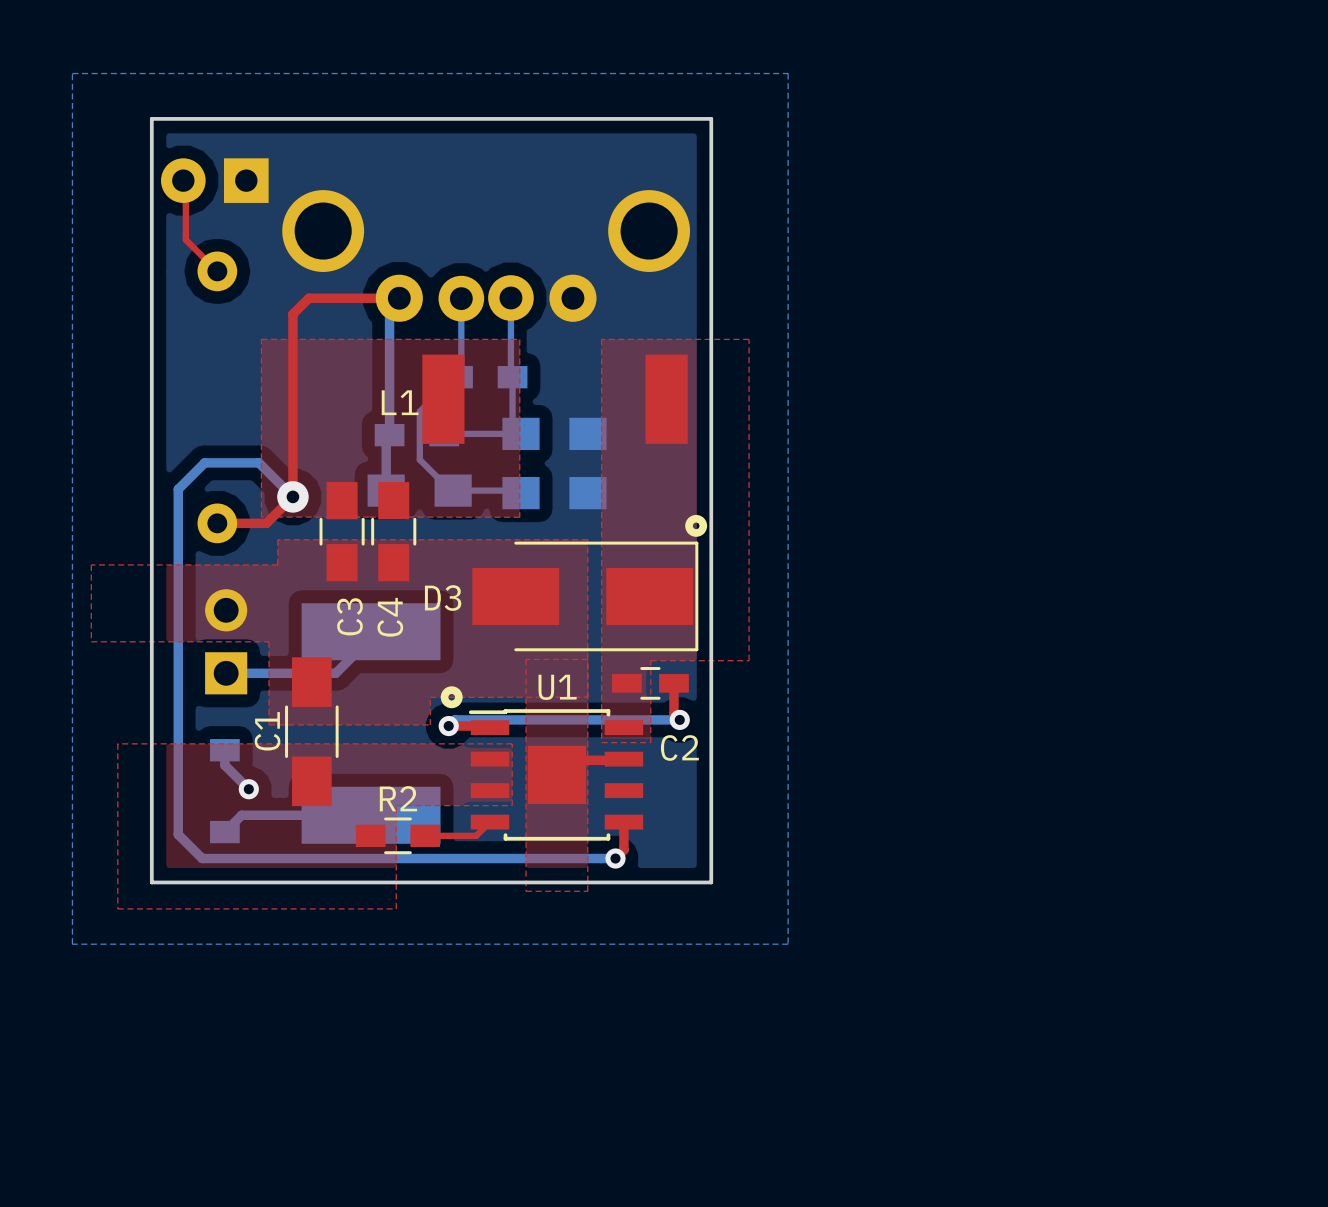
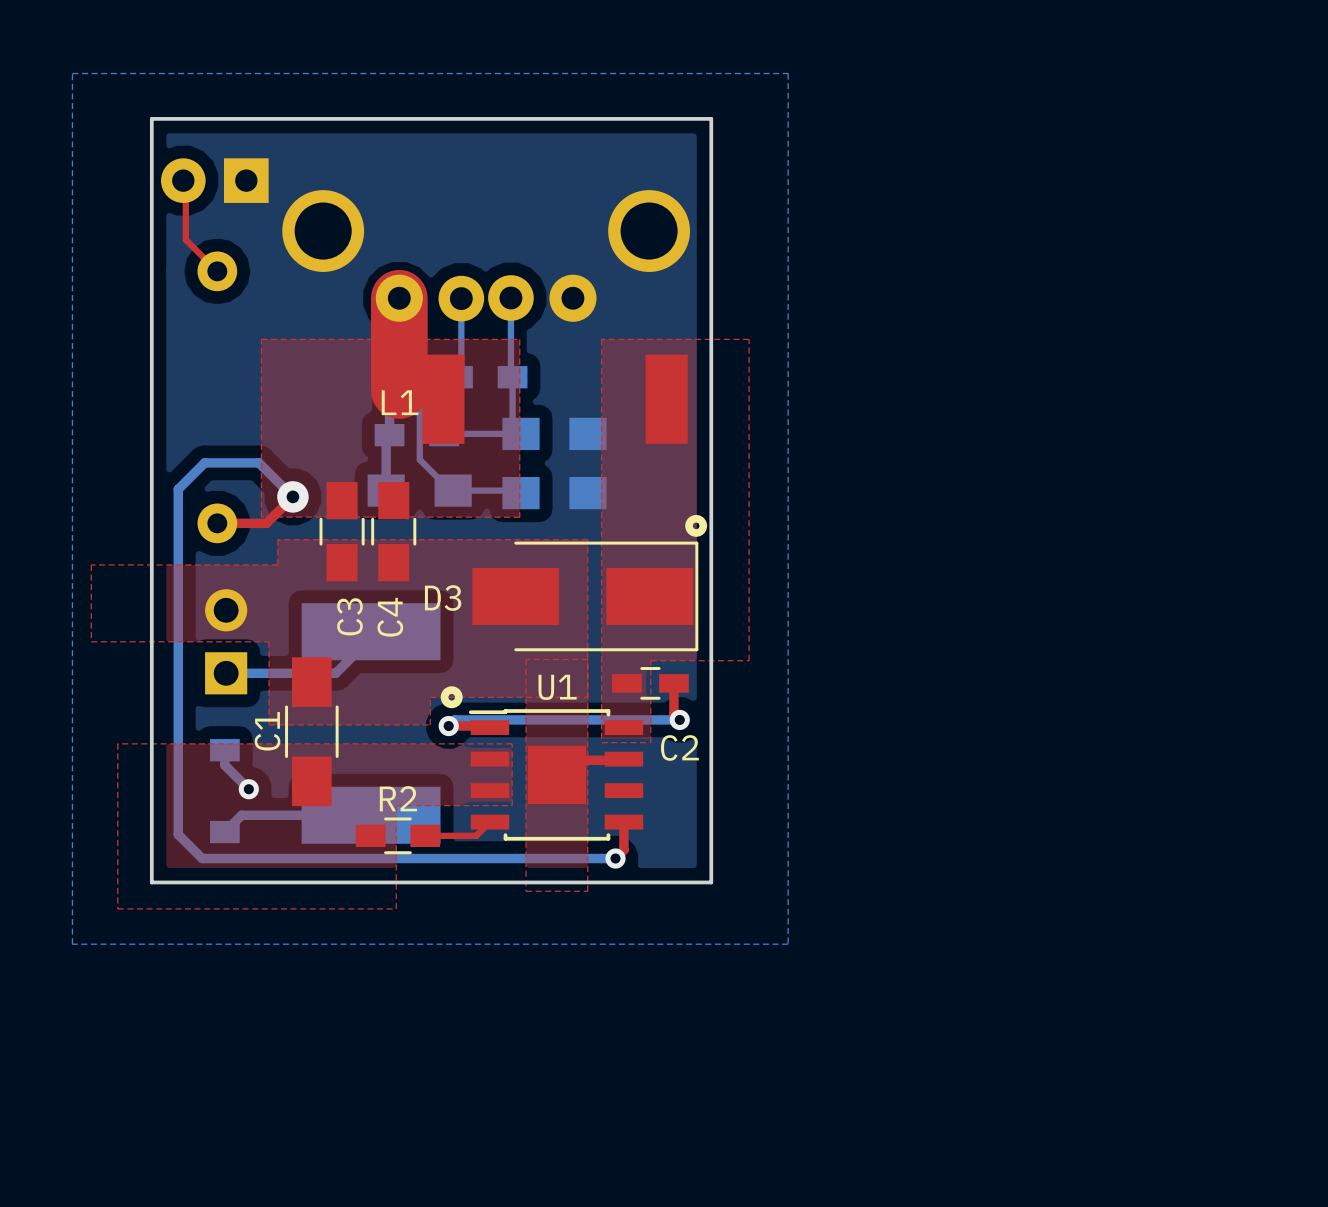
top track: (399, 298) (308, 298) (292, 314) (292, 496) -> (399, 298) (399, 390)

